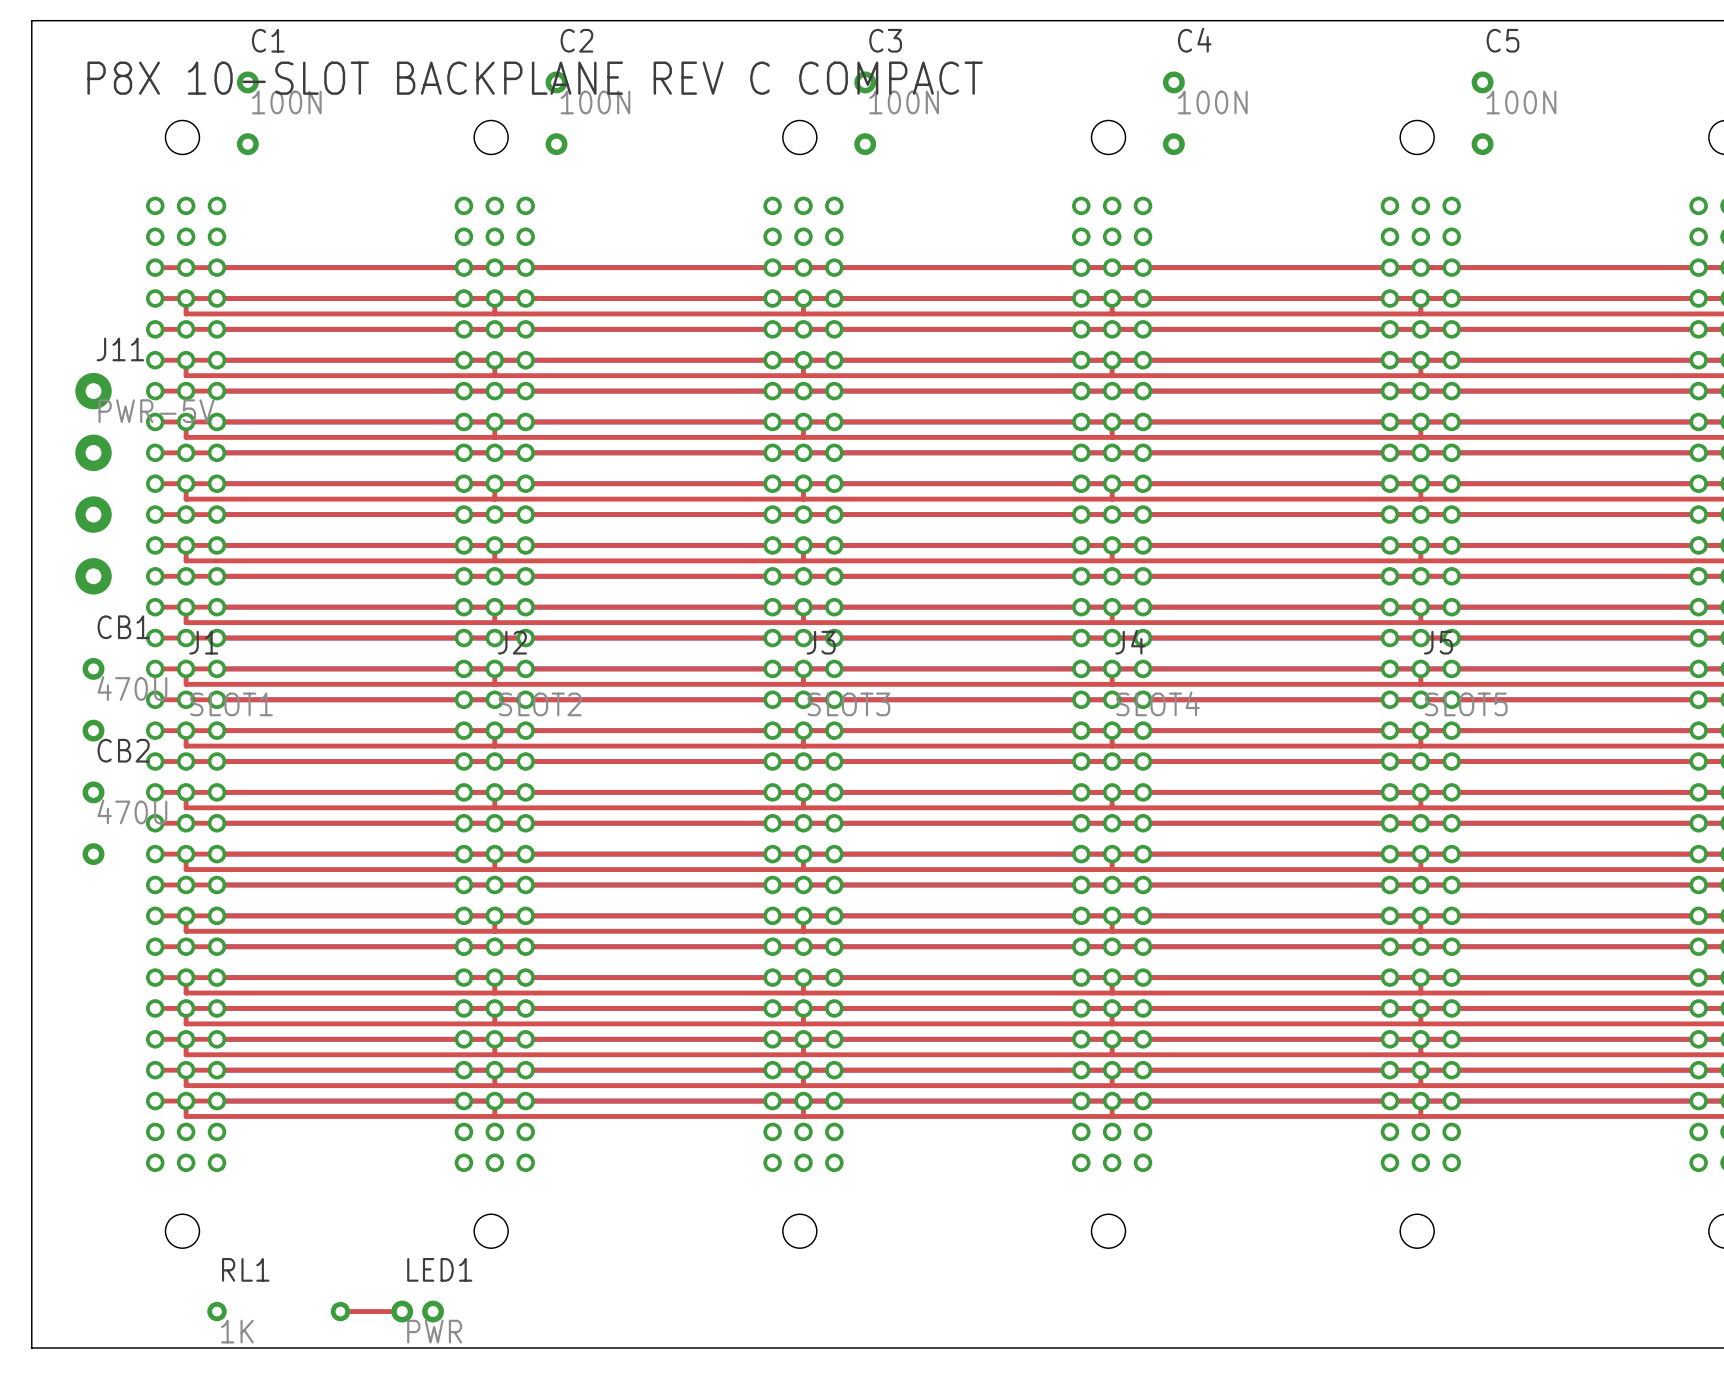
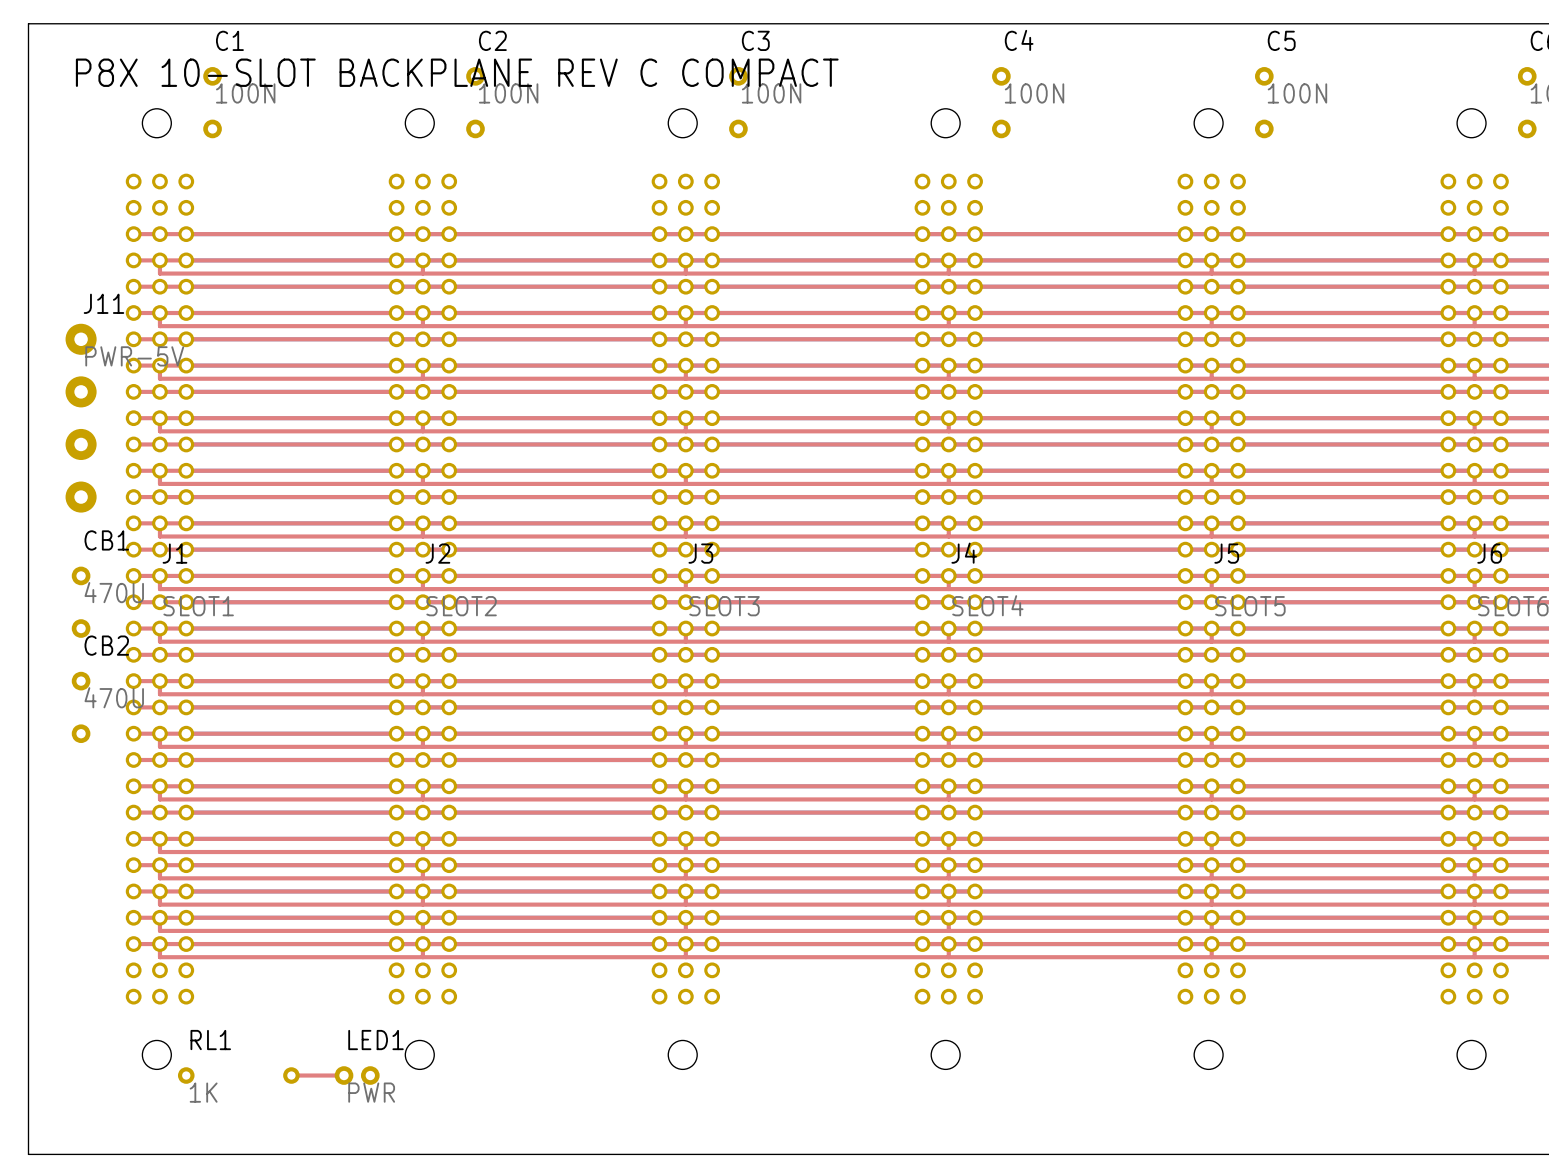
RL1 position: (278, 1311) -> (238, 1075)
top track: (340, 1311) (402, 1311) -> (291, 1075) (344, 1075)
LED1 position: (417, 1311) -> (357, 1075)

